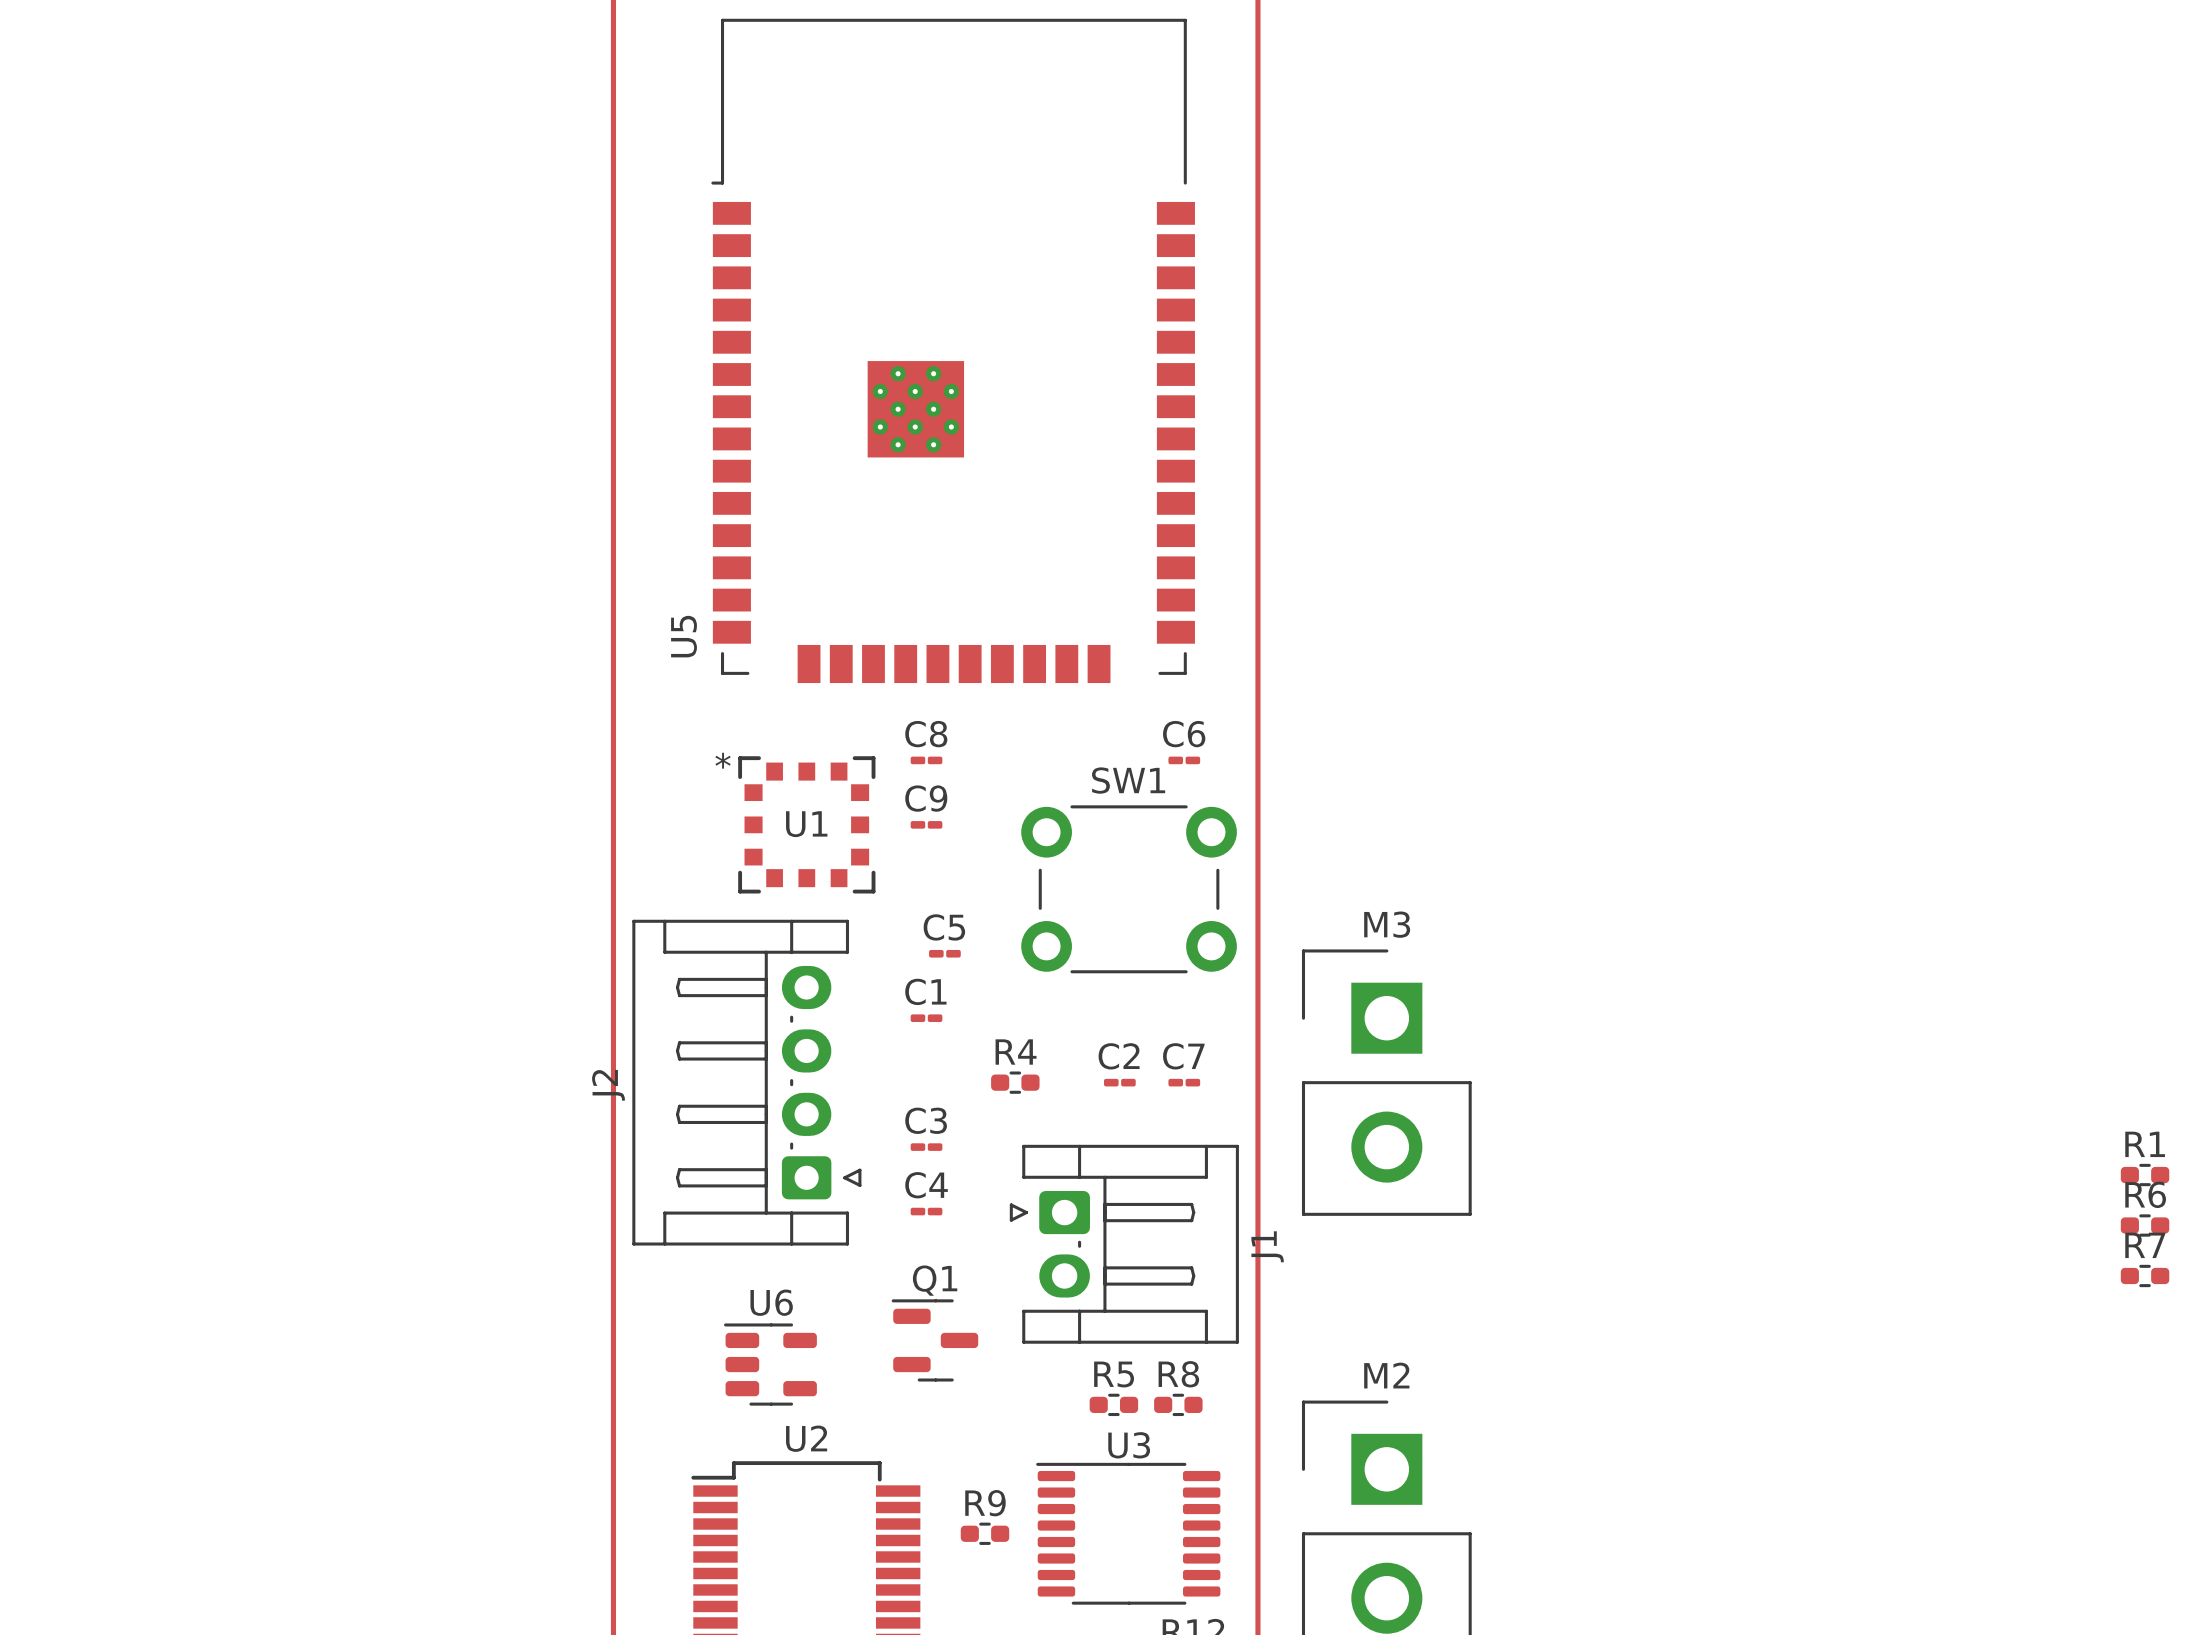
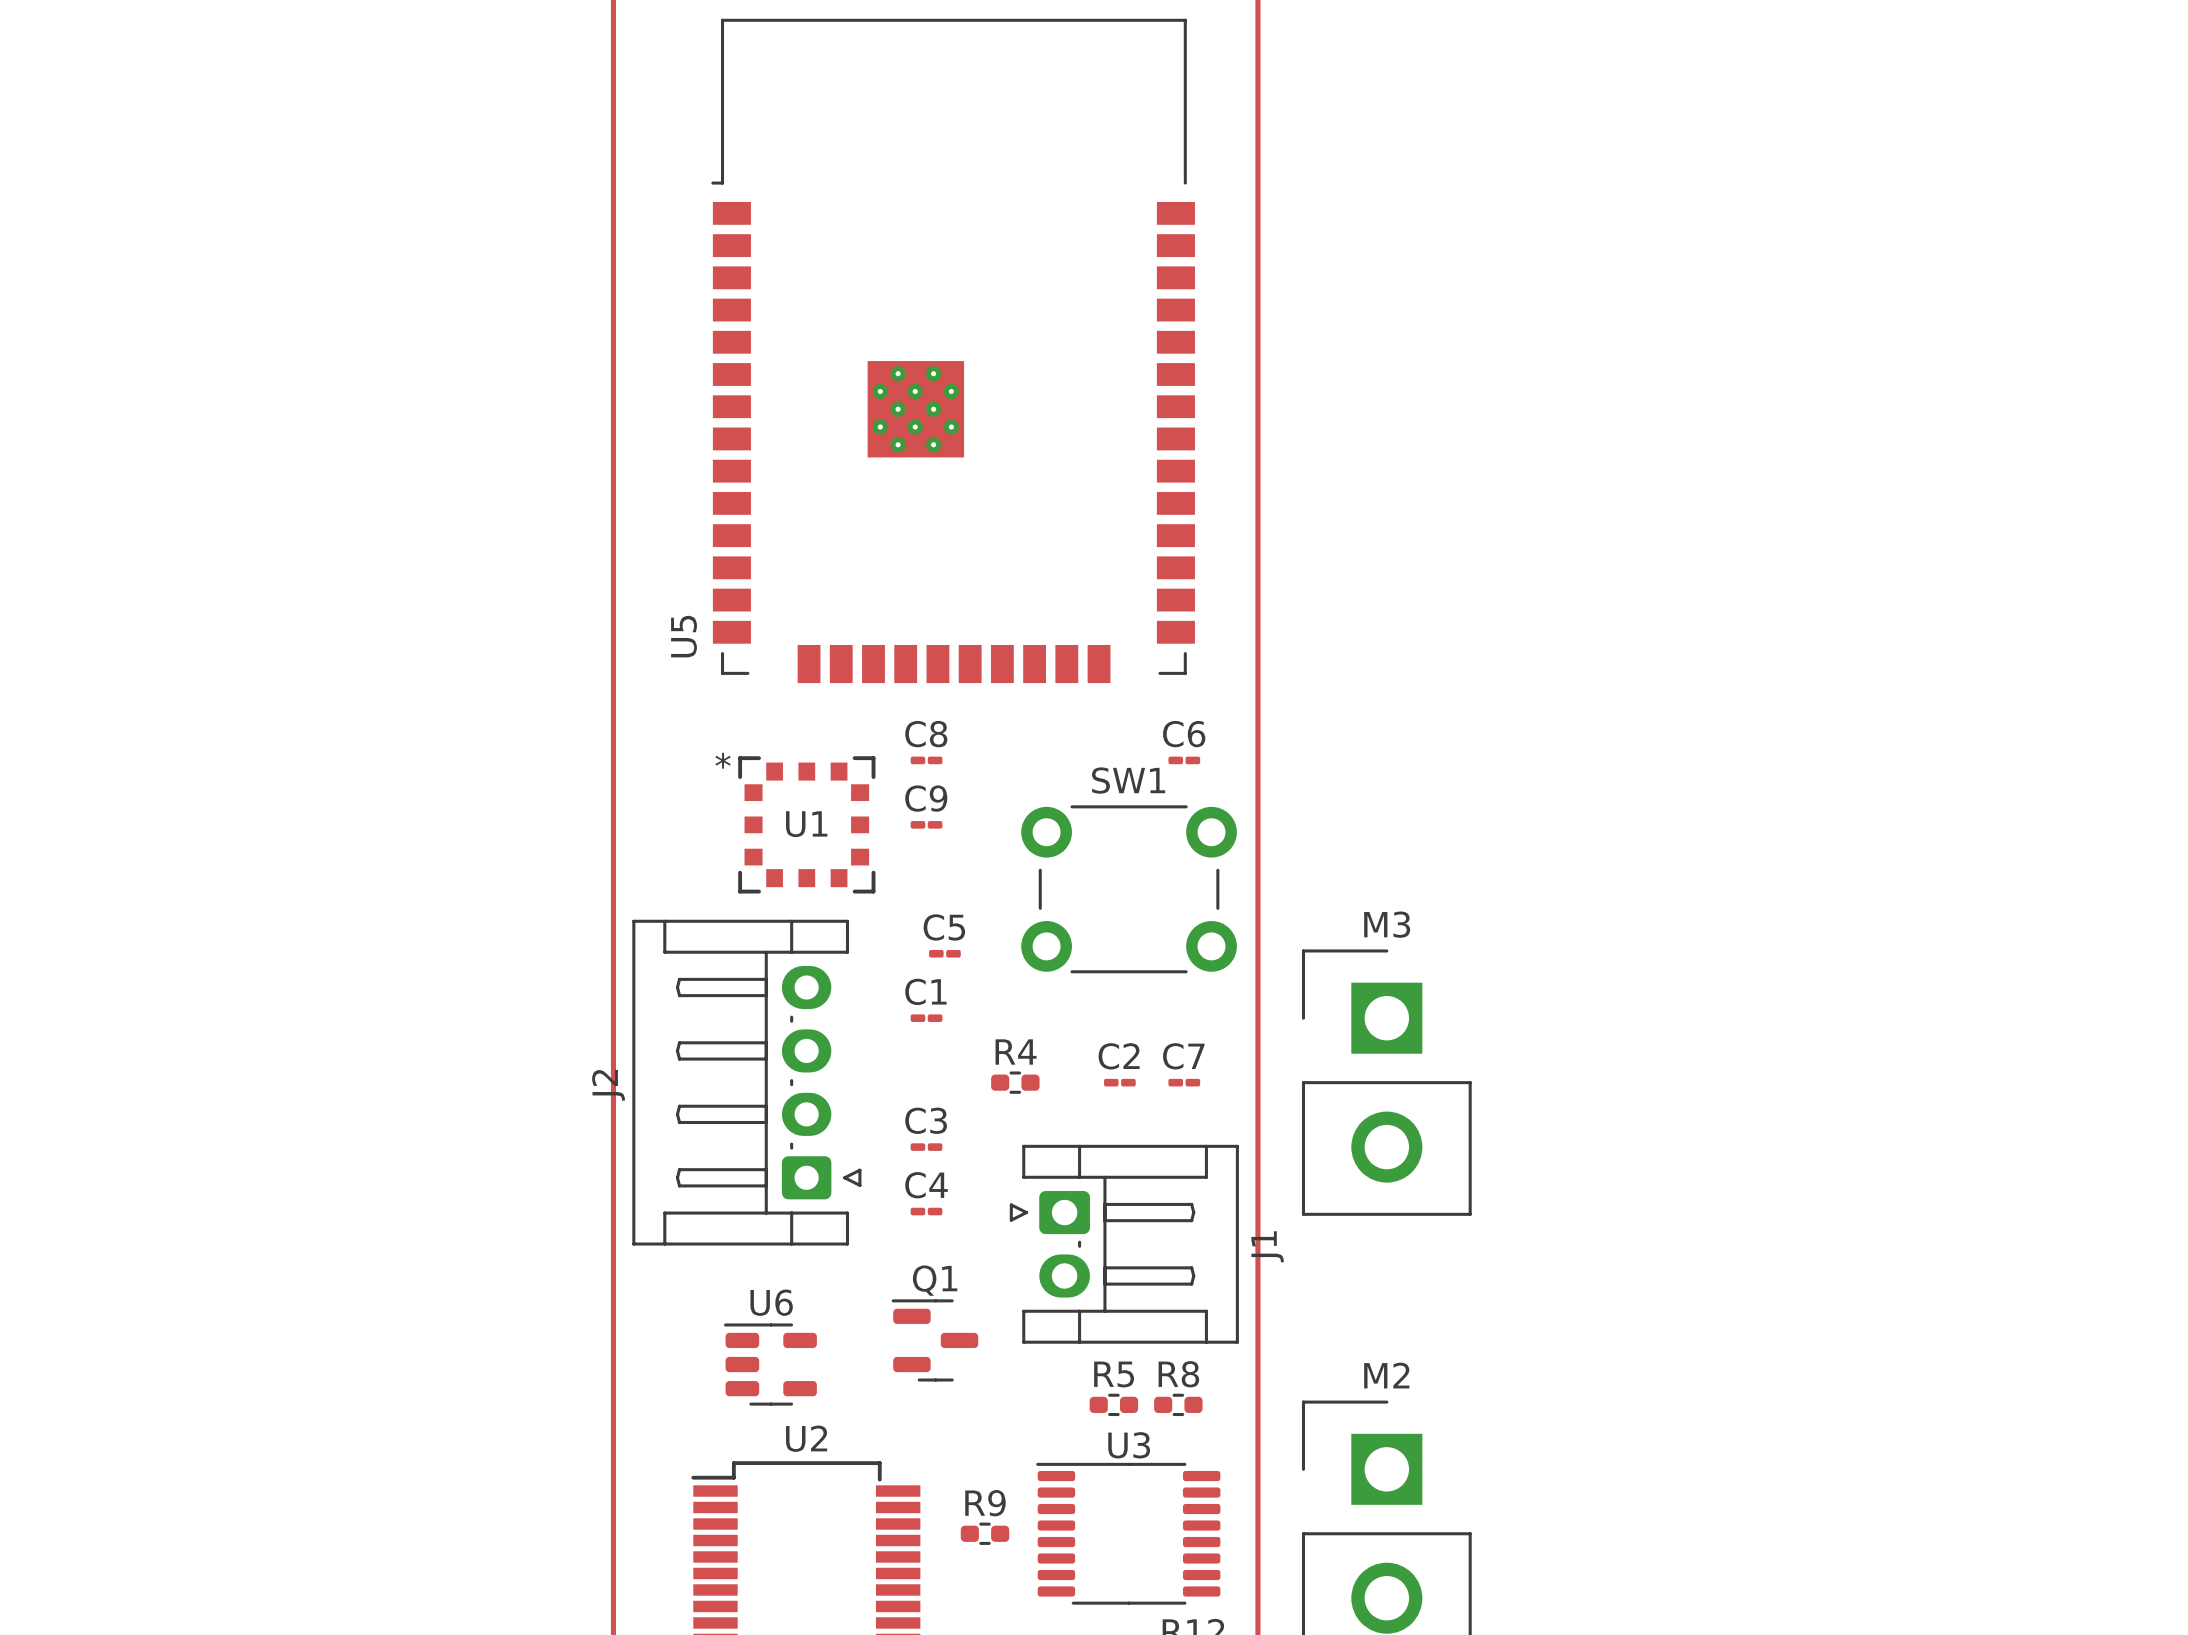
R1: (2145, 1175) -> none
R6: (2145, 1225) -> none
R7: (2145, 1275) -> none

